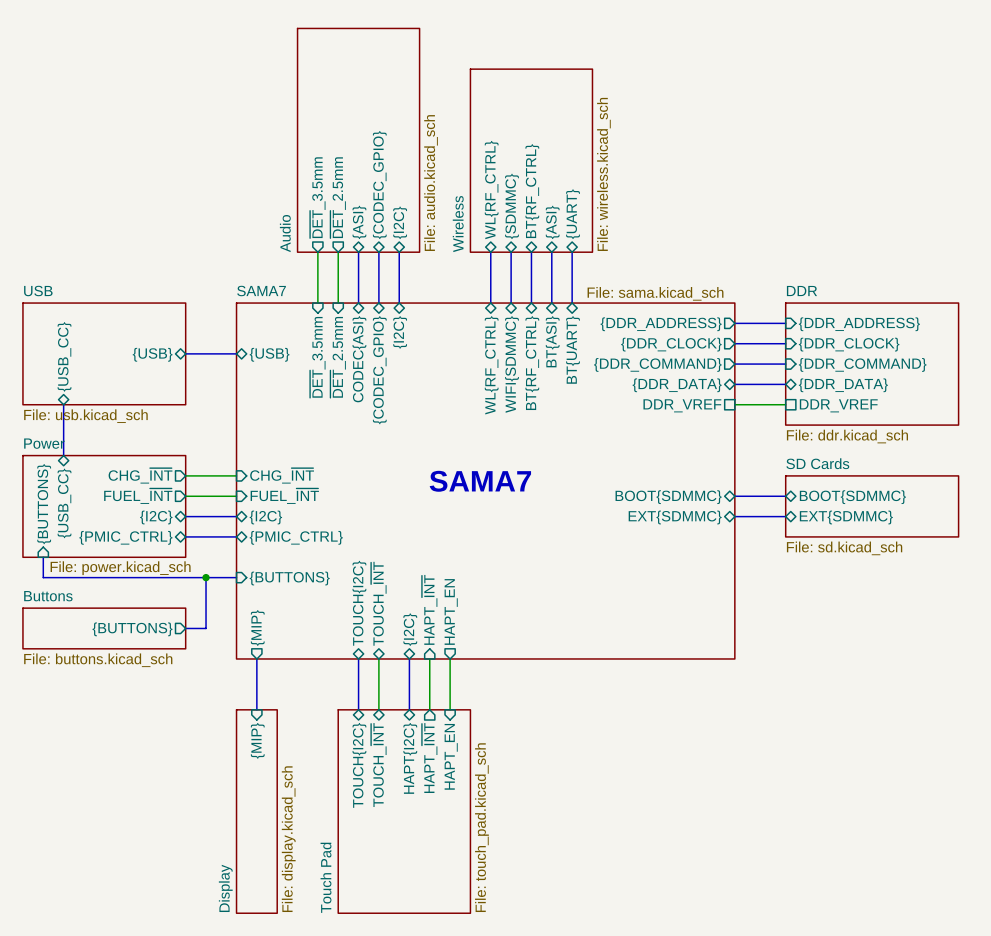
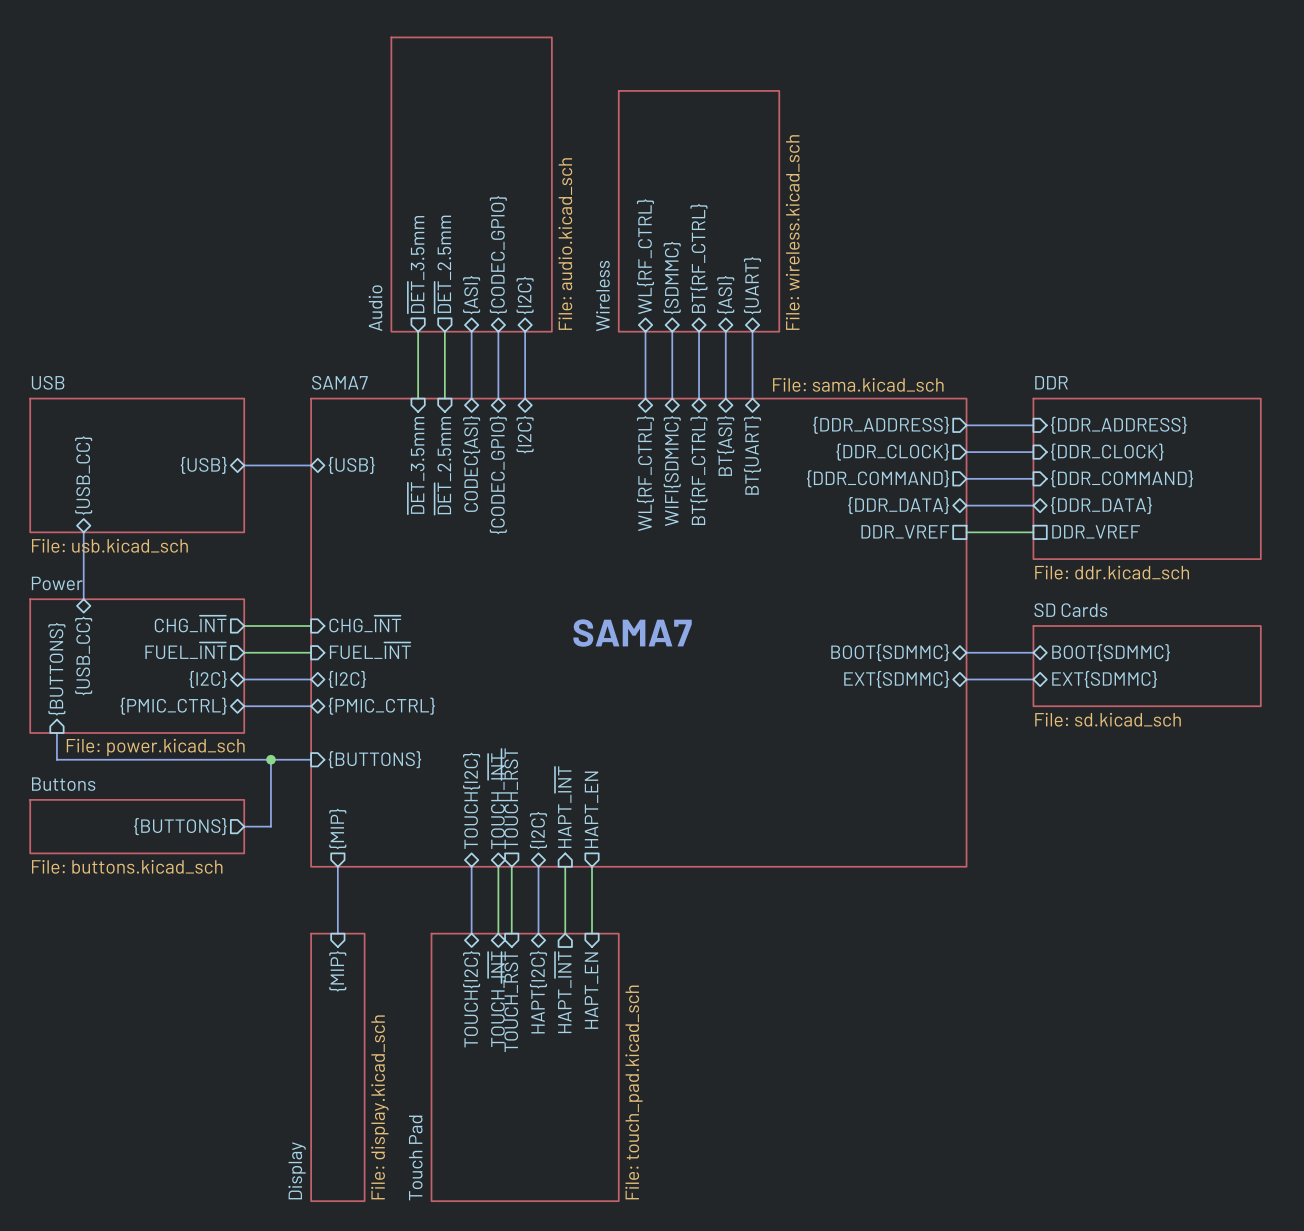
sheet pin: none -> TOUCH_~{RST} (509, 798)
wire: none -> (511, 866) (511, 933)
sheet Touch Pad shape: [337, 709, 472, 914] -> [430, 932, 620, 1202]
sheet pin: none -> TOUCH_~{RST} (509, 1001)

